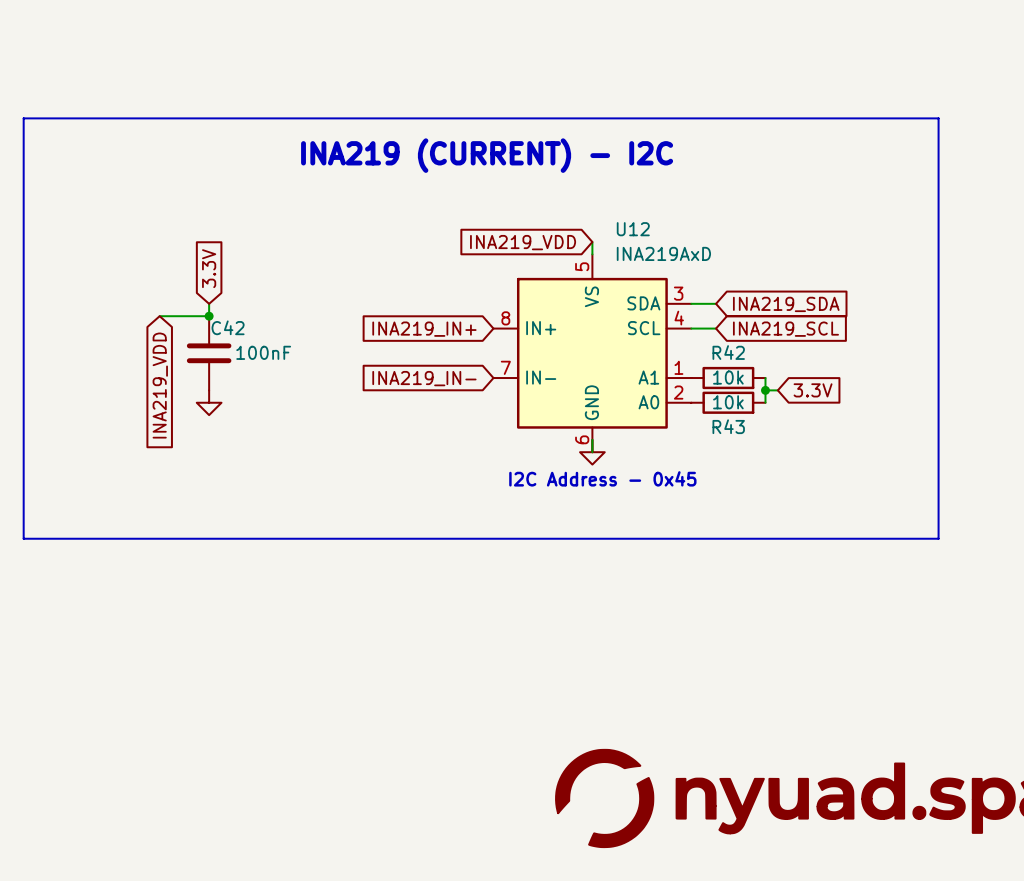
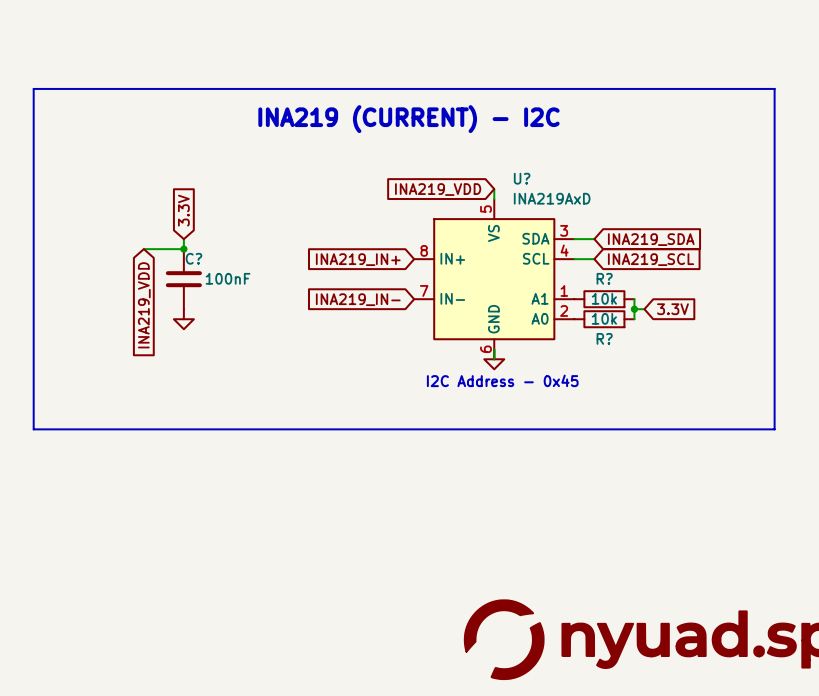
U12 name: U12 (633, 229) -> U? (522, 178)
C42 name: C42 (228, 327) -> C? (193, 258)
R42 name: R42 (728, 352) -> R? (604, 278)
R43 name: R43 (728, 426) -> R? (604, 338)

